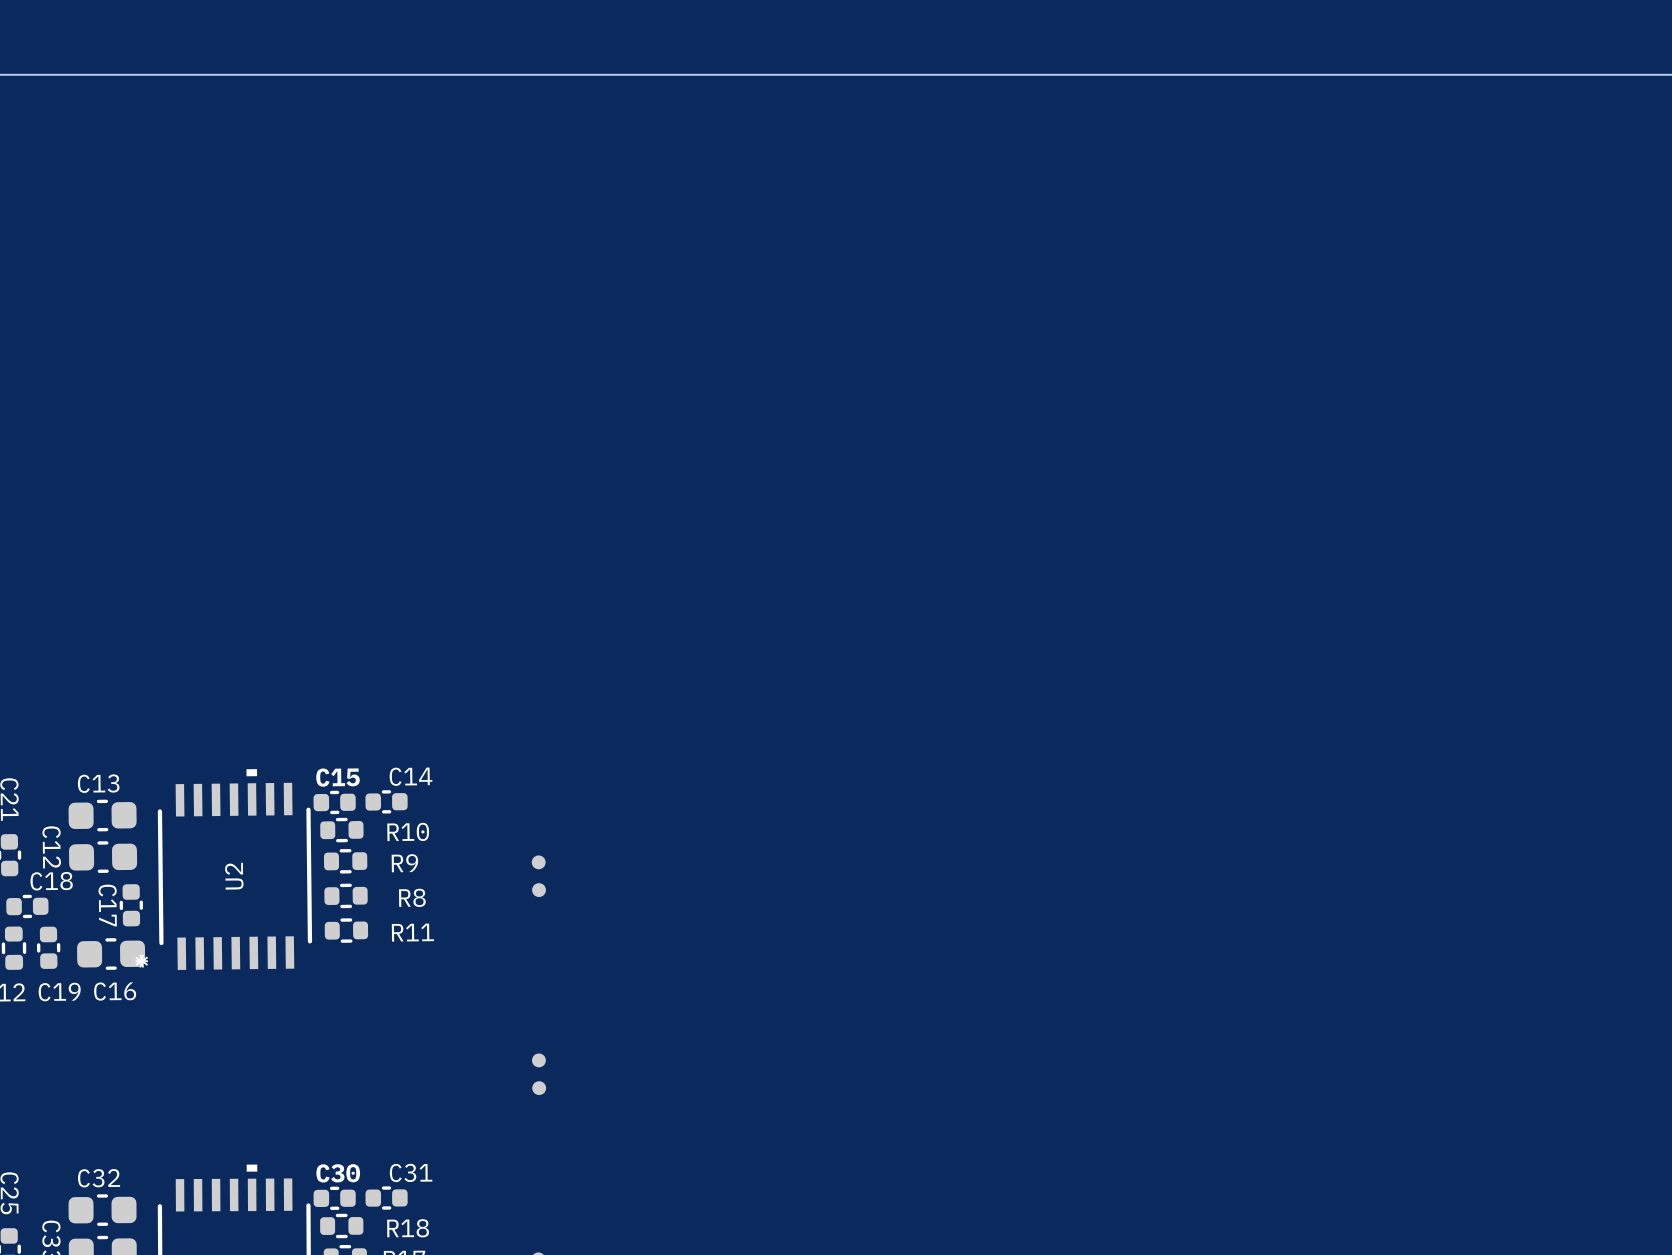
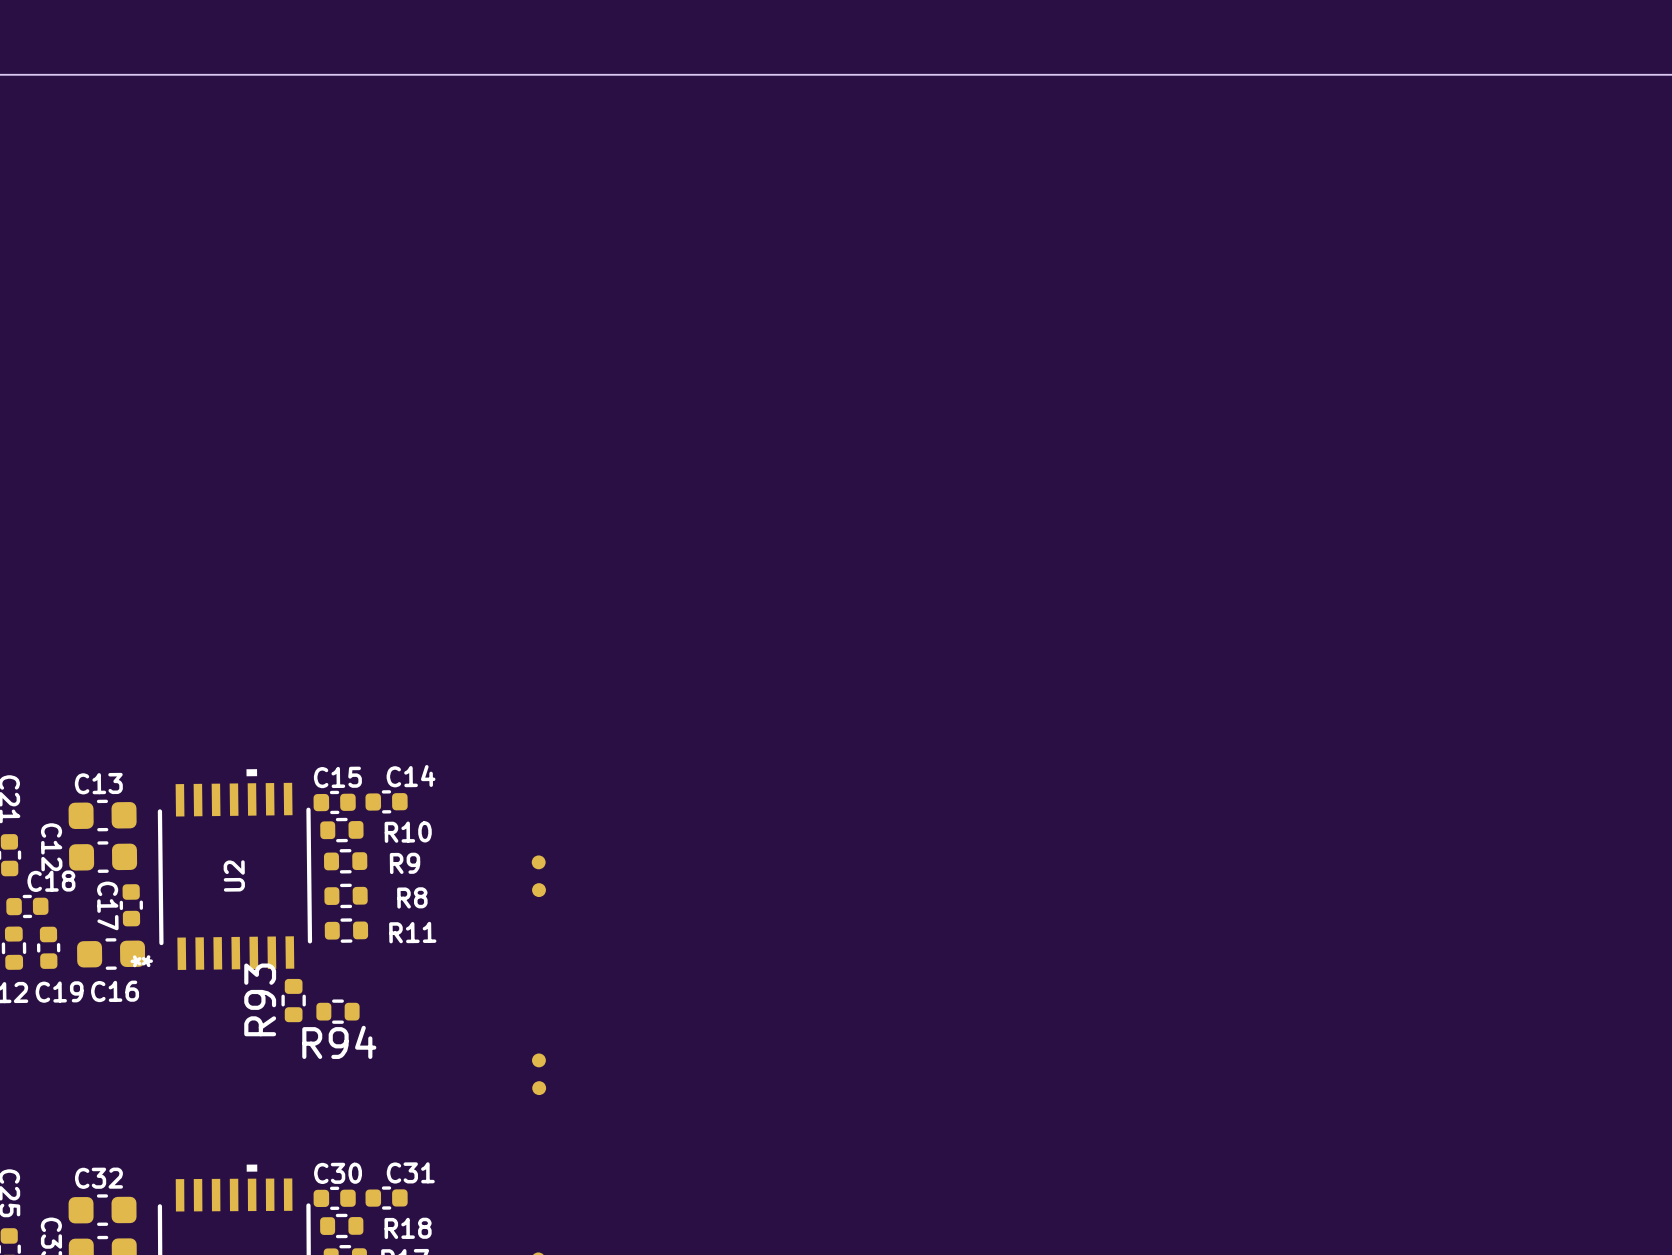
R93: none -> (293, 1000)
R94: none -> (337, 1011)

